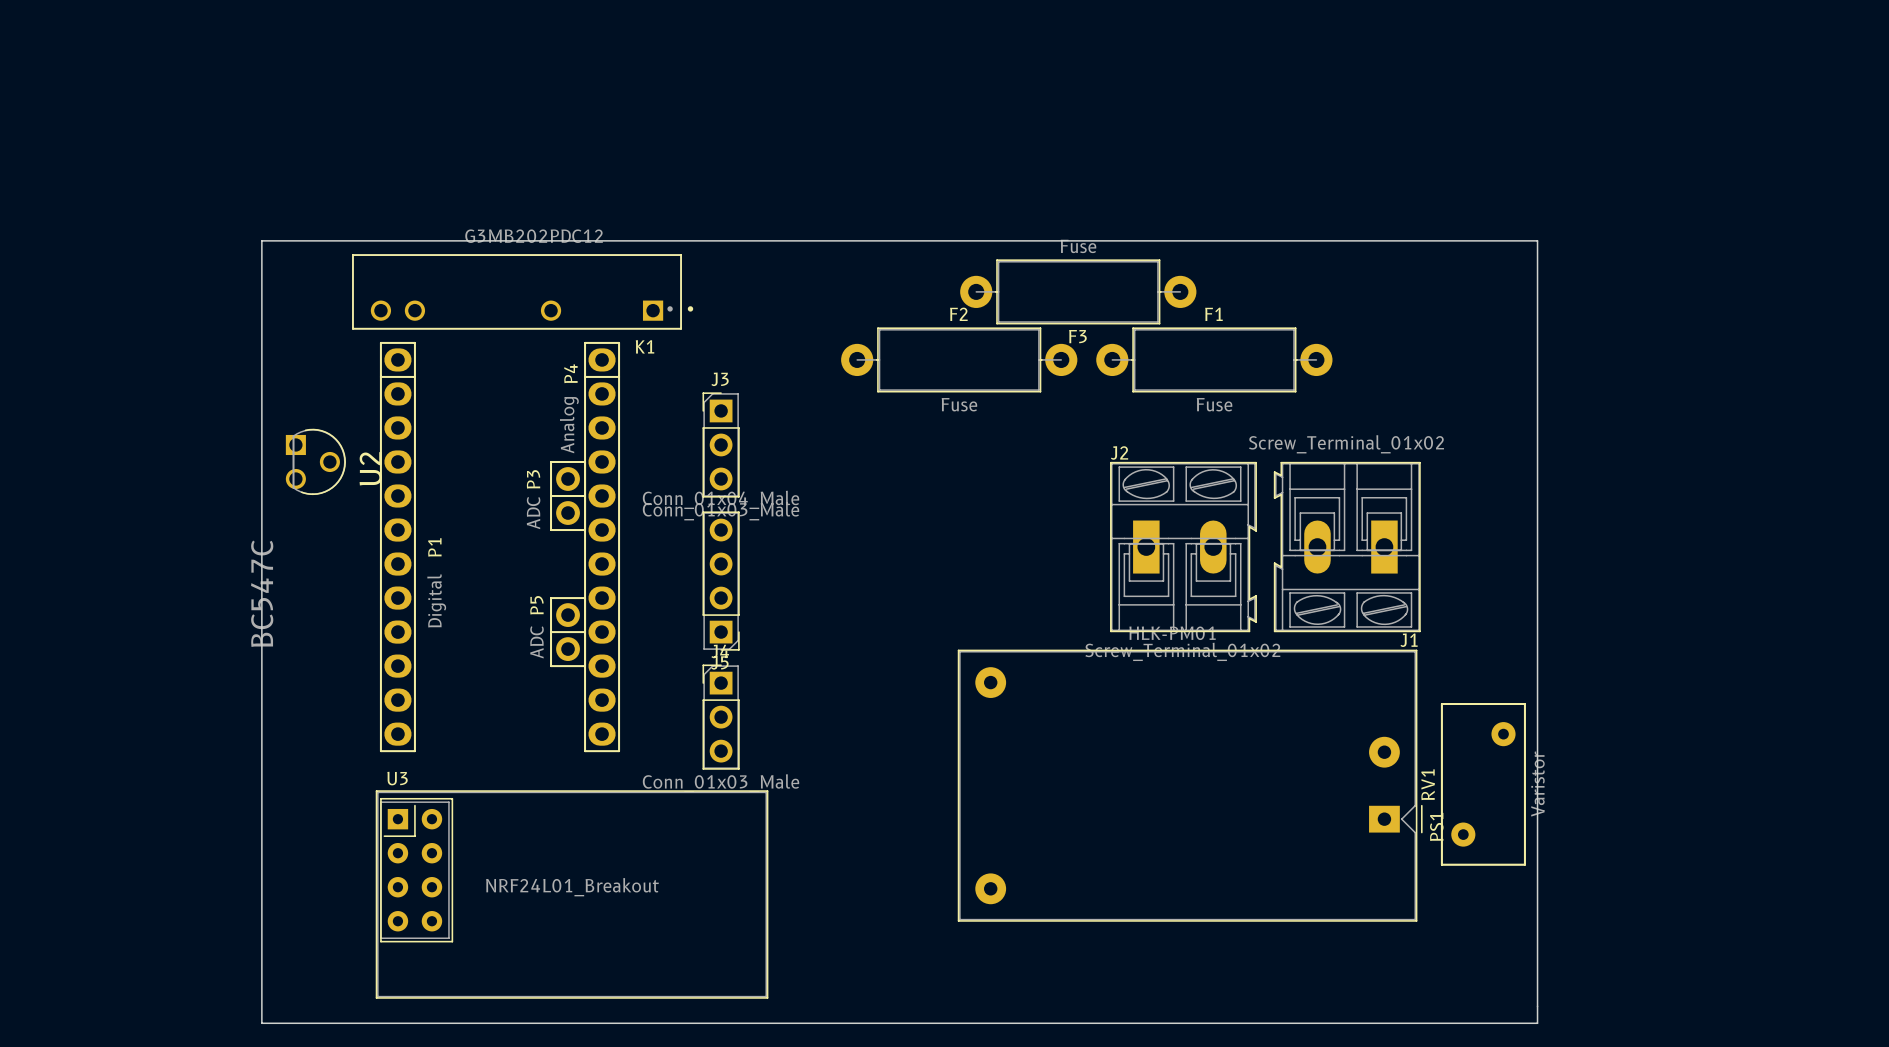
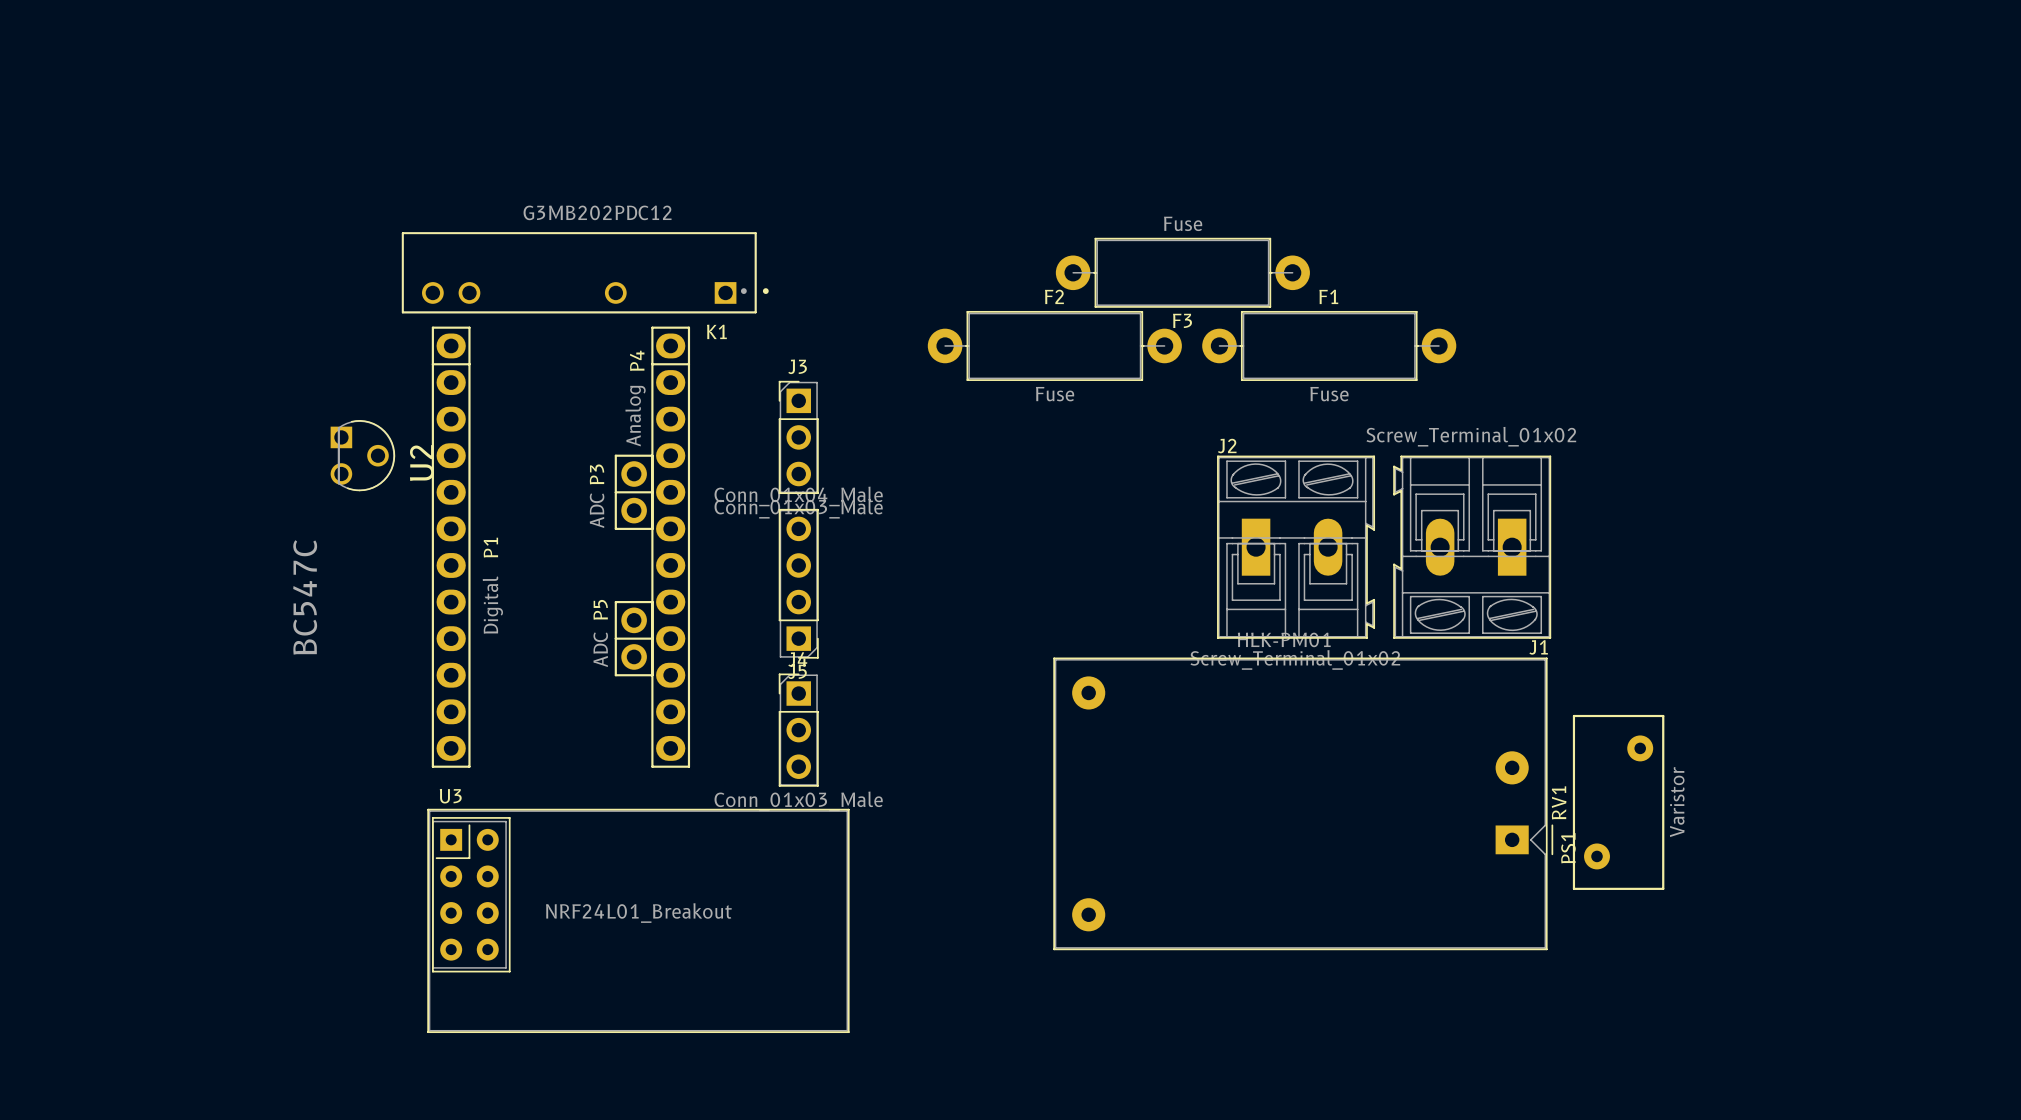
board edge: (261, 240) (261, 1023) (1537, 1023) (1537, 240) (261, 240) -> none

